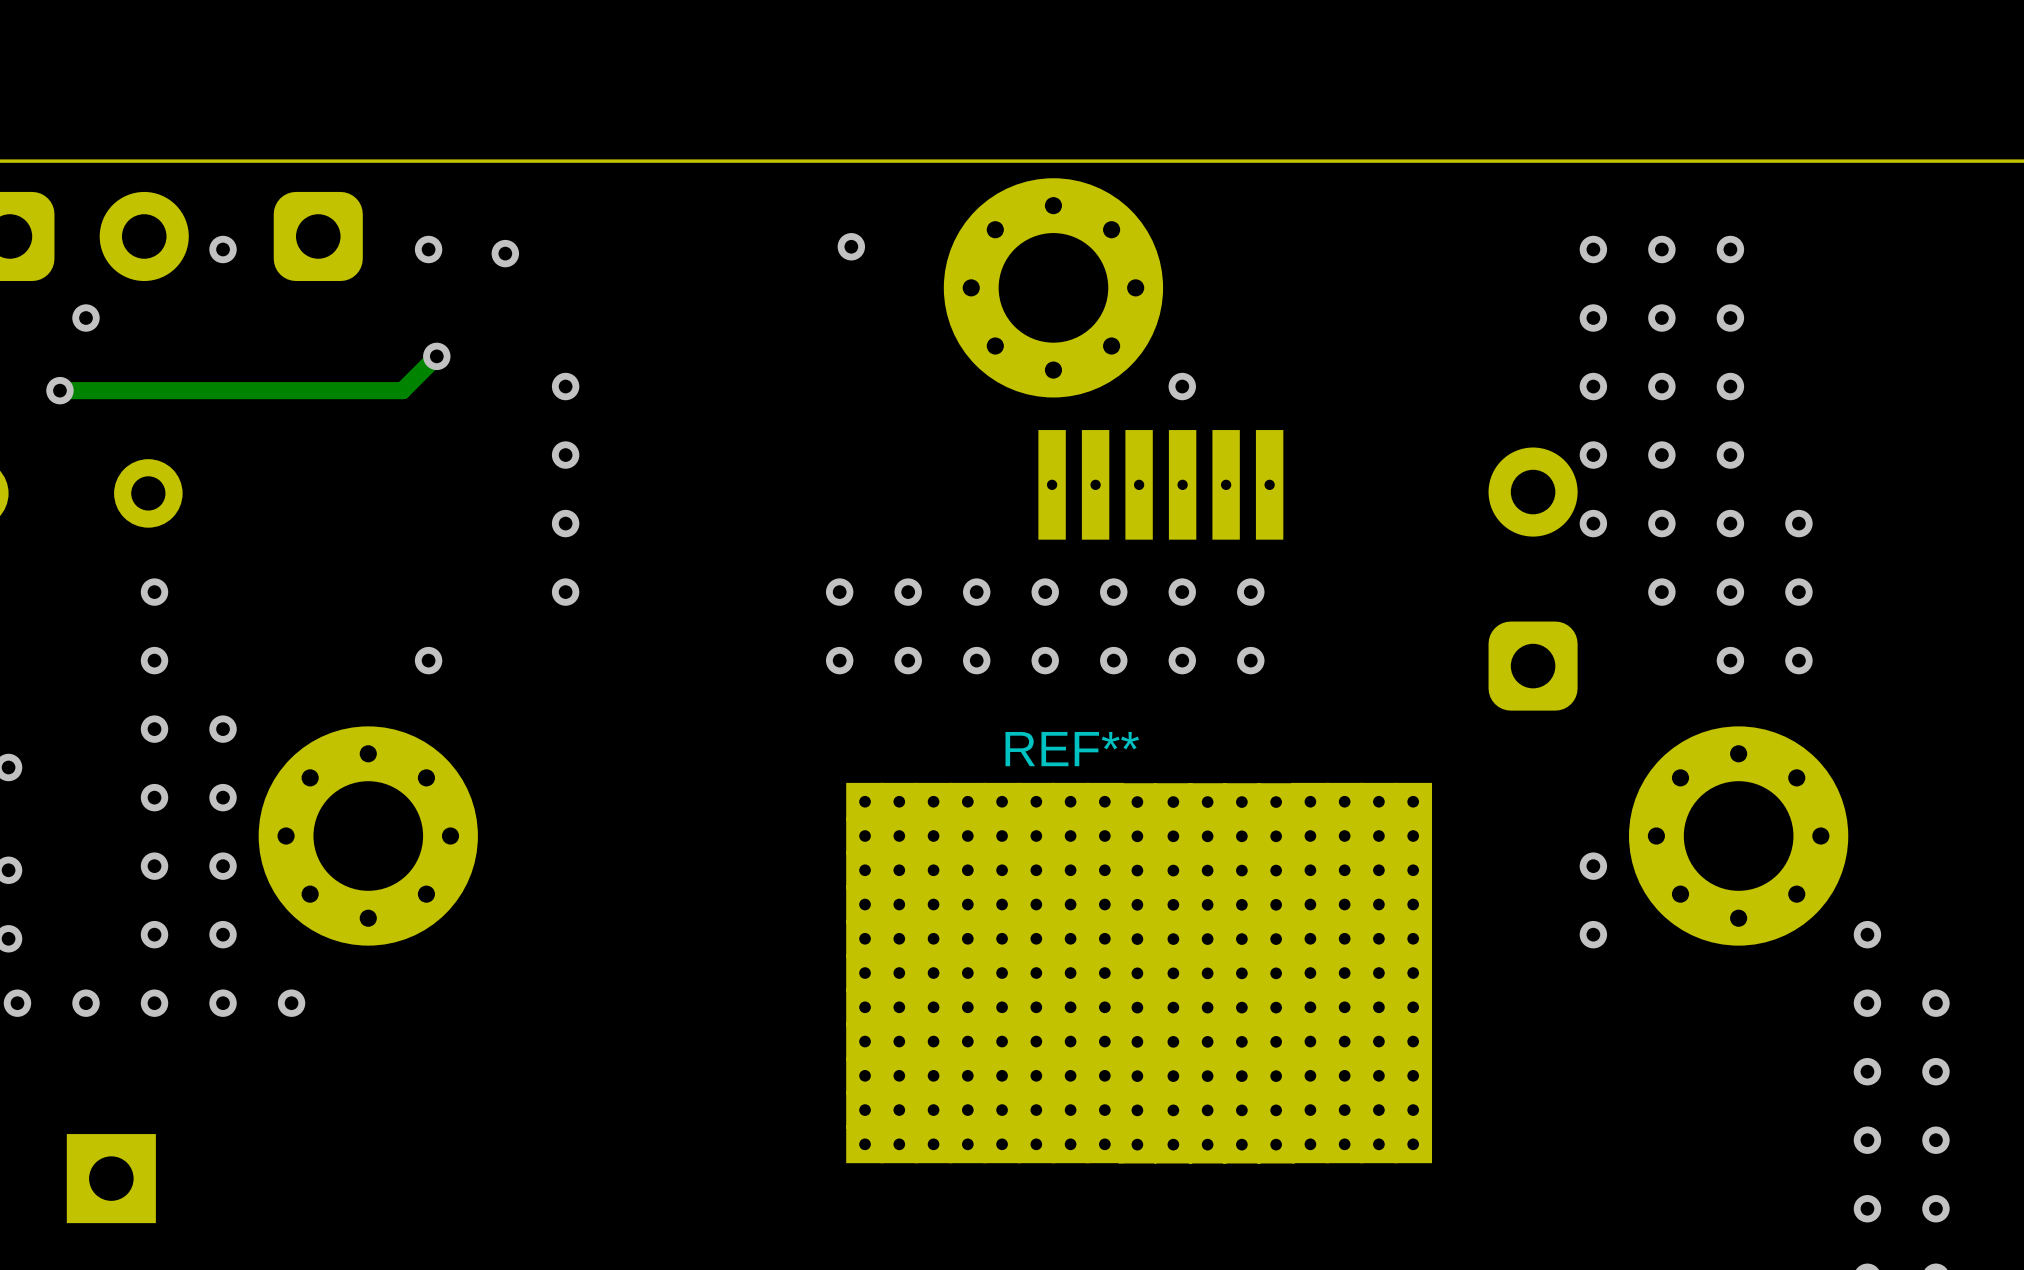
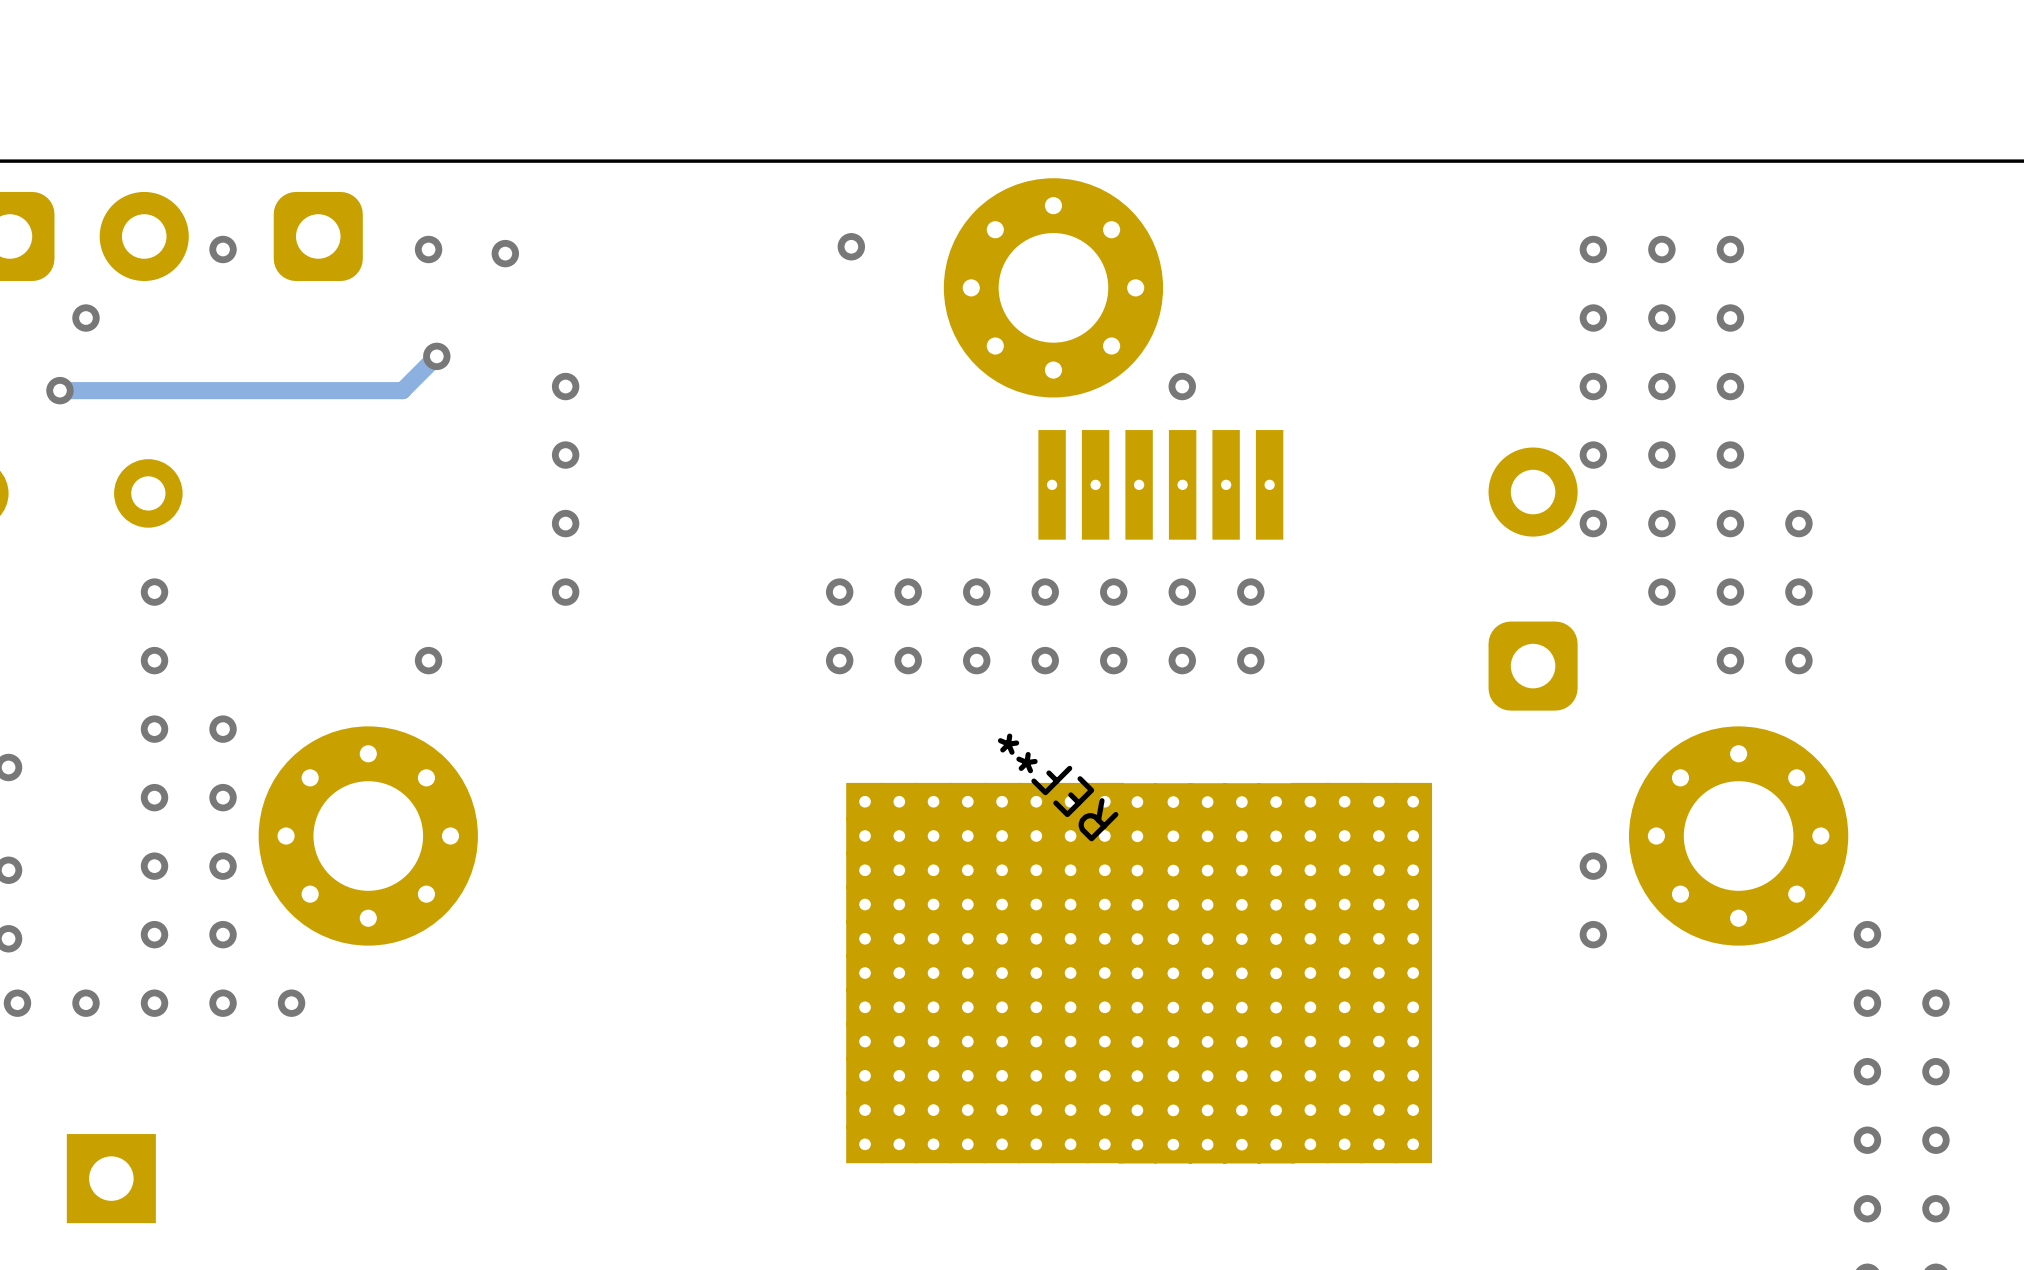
REF** position: (1072, 749) -> (1058, 787)
REF** name rotation: 0° (1072, 749) -> 135° counterclockwise (1058, 787)

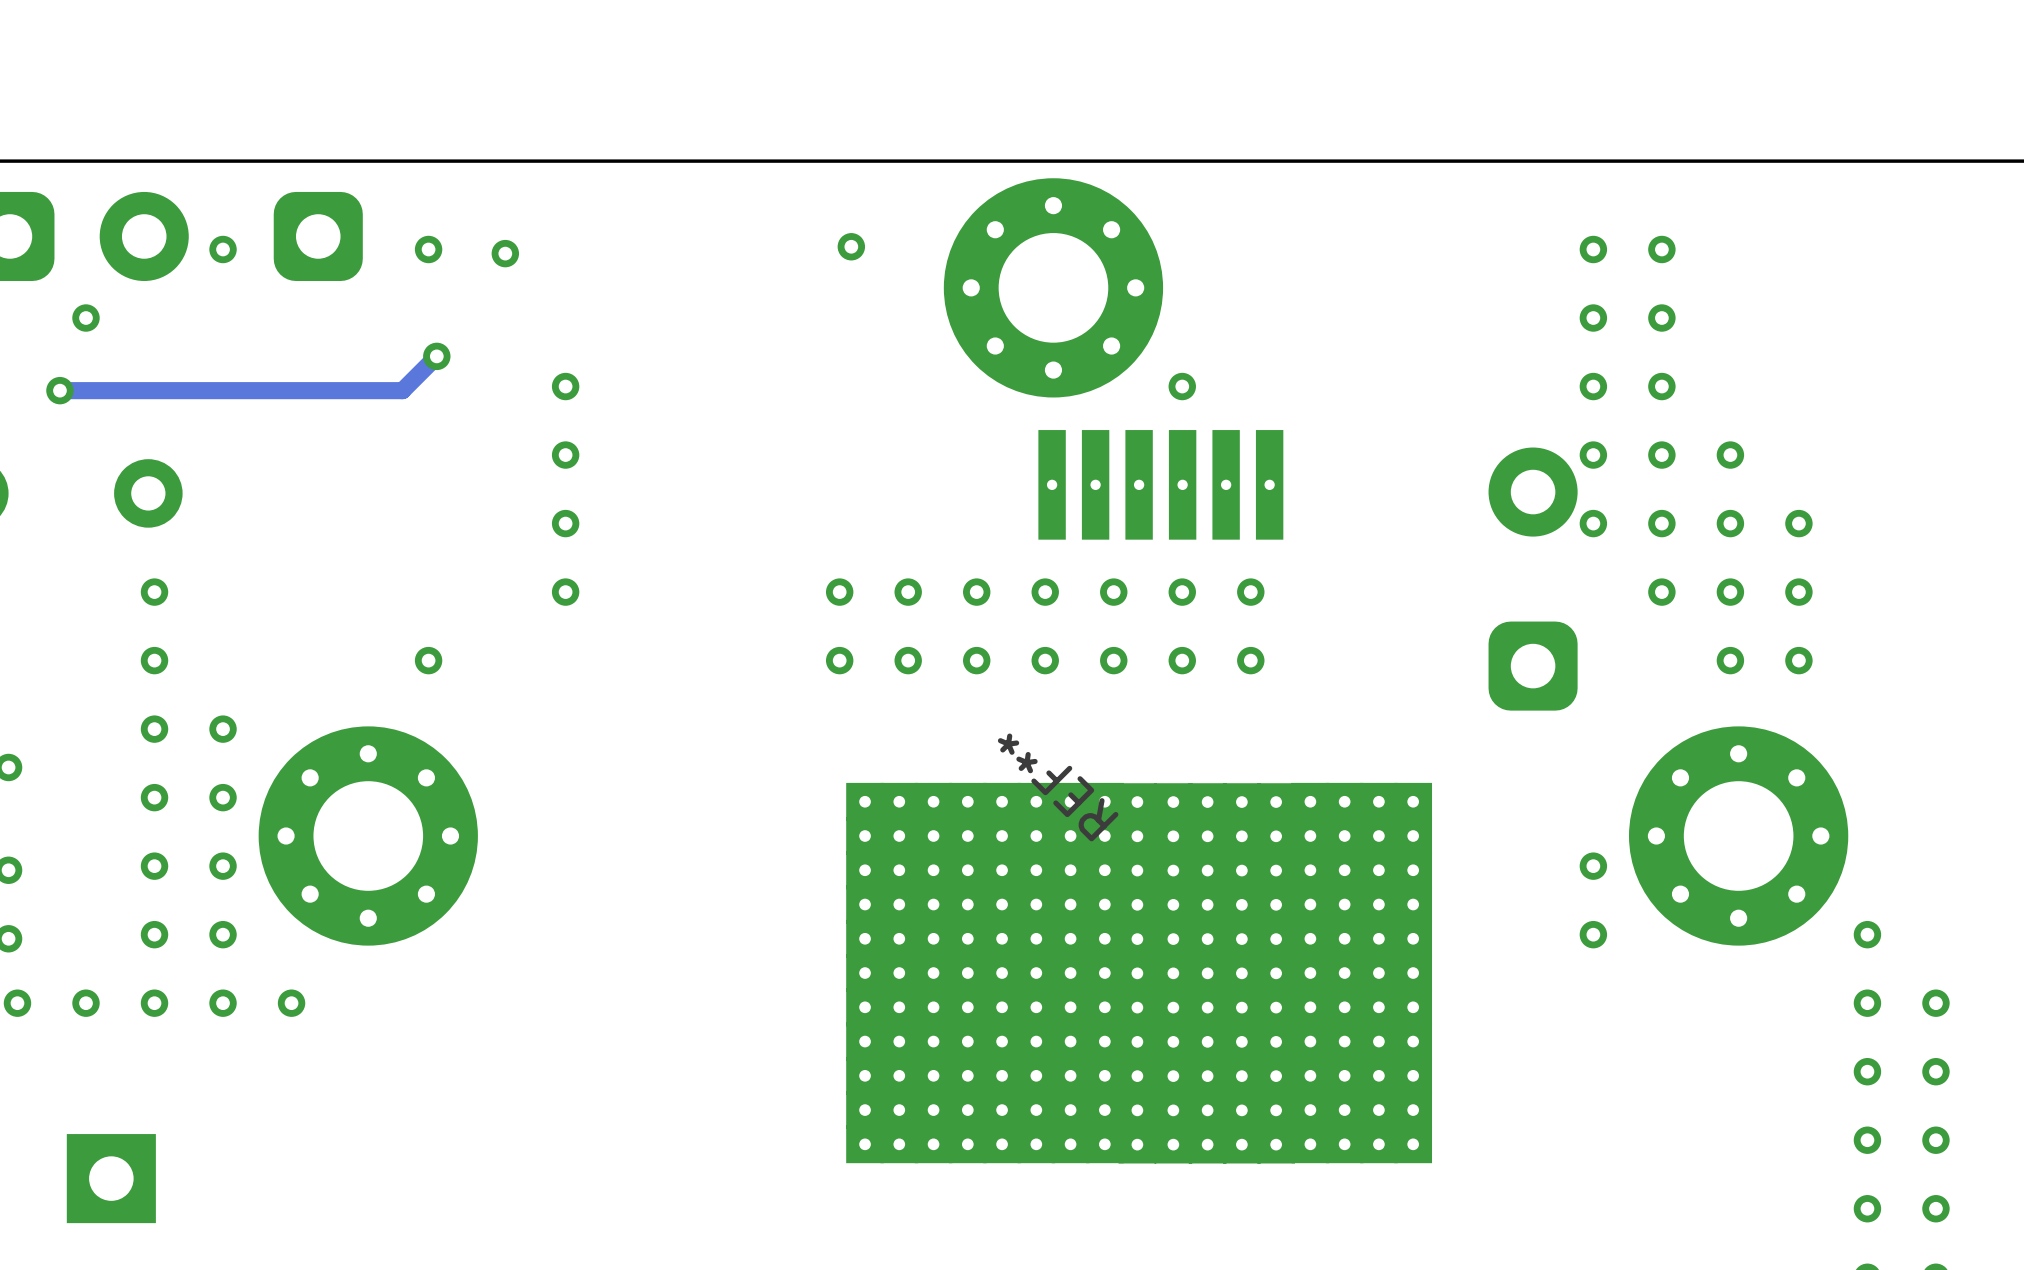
via: (1730, 249) -> none
via: (1730, 318) -> none
via: (1730, 386) -> none

